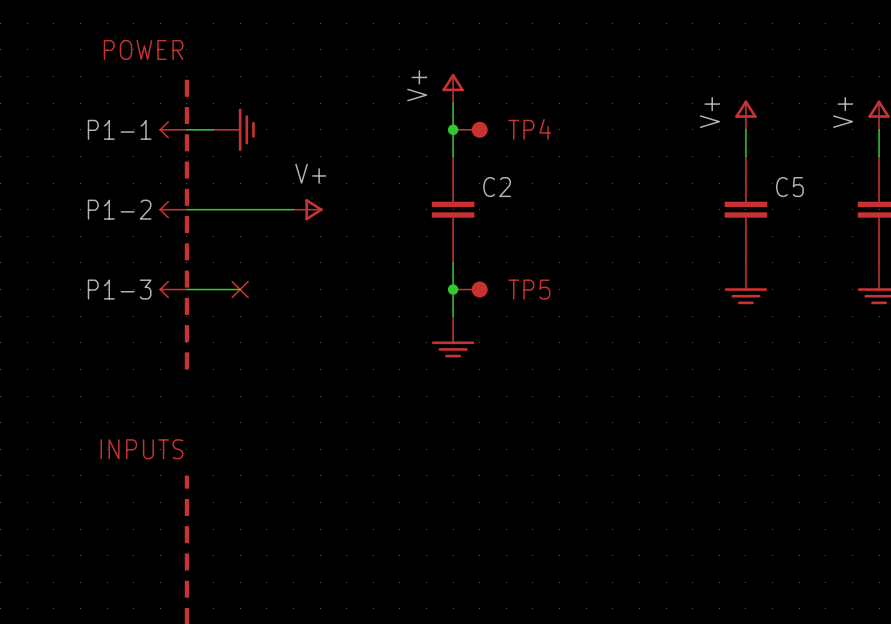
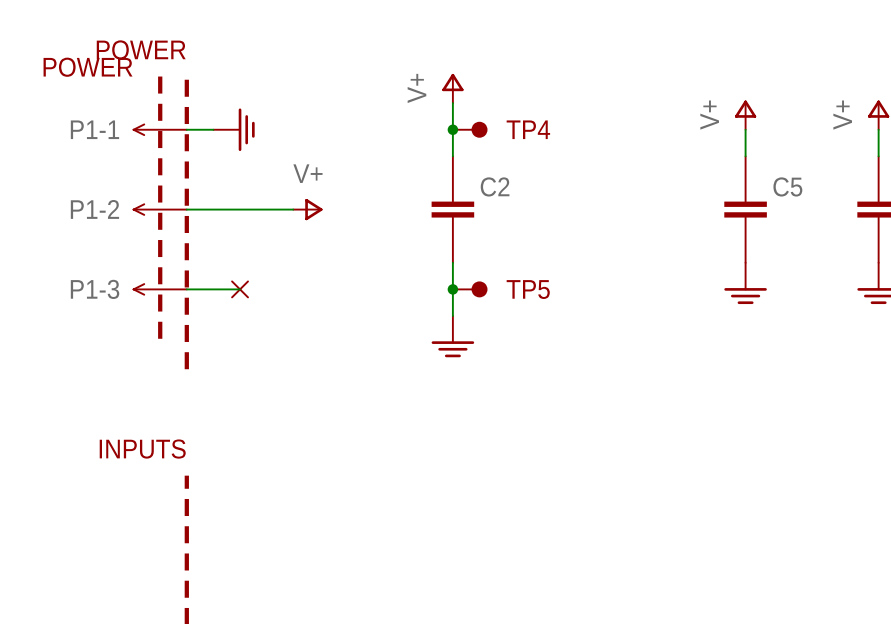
P1-1 symbol: [159, 121, 188, 139] -> [132, 123, 187, 136]
P1-2 symbol: [159, 200, 188, 219] -> [132, 203, 187, 216]
part: none -> POWER (160, 209)
P1-3 symbol: [159, 280, 188, 299] -> [132, 283, 187, 296]

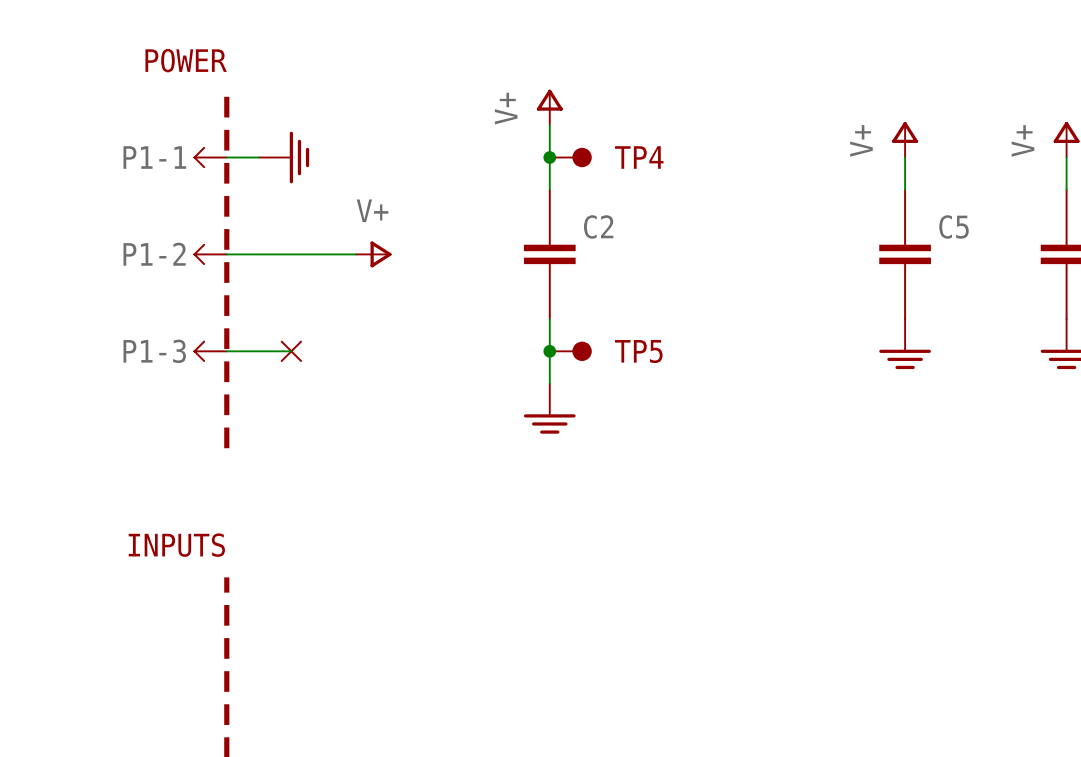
P1-1 symbol: [132, 123, 187, 136] -> [193, 146, 228, 169]
P1-2 symbol: [132, 203, 187, 216] -> [193, 243, 228, 266]
part: POWER (160, 209) -> none
P1-3 symbol: [132, 283, 187, 296] -> [193, 340, 228, 362]

